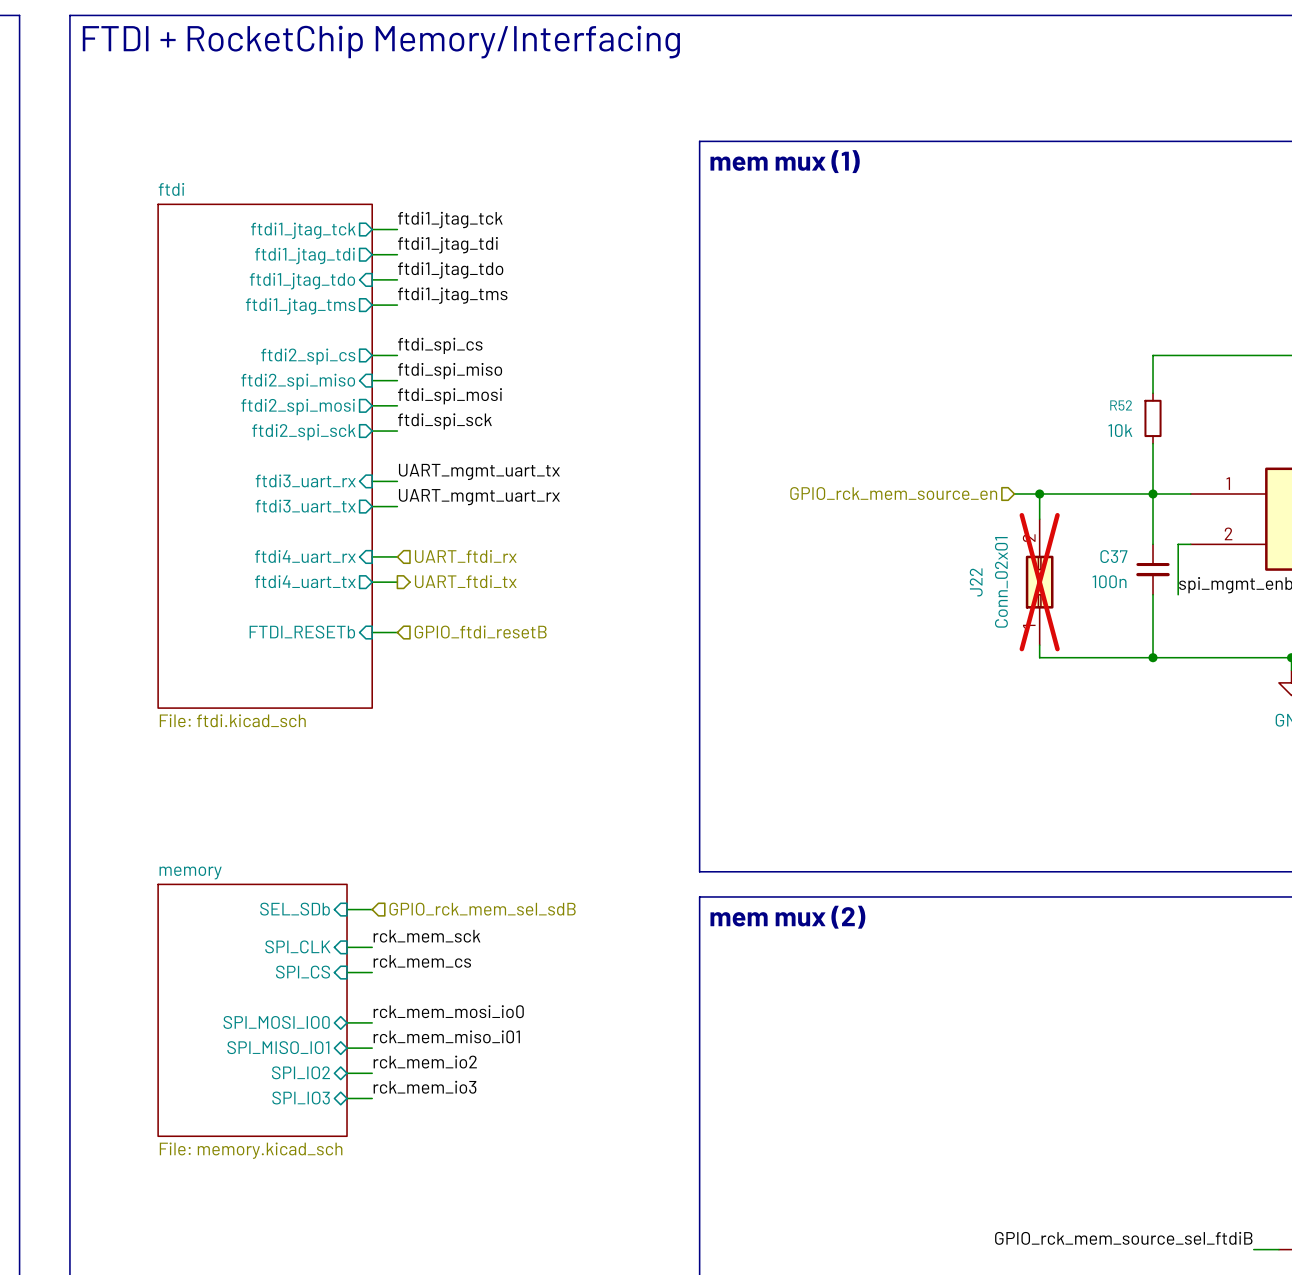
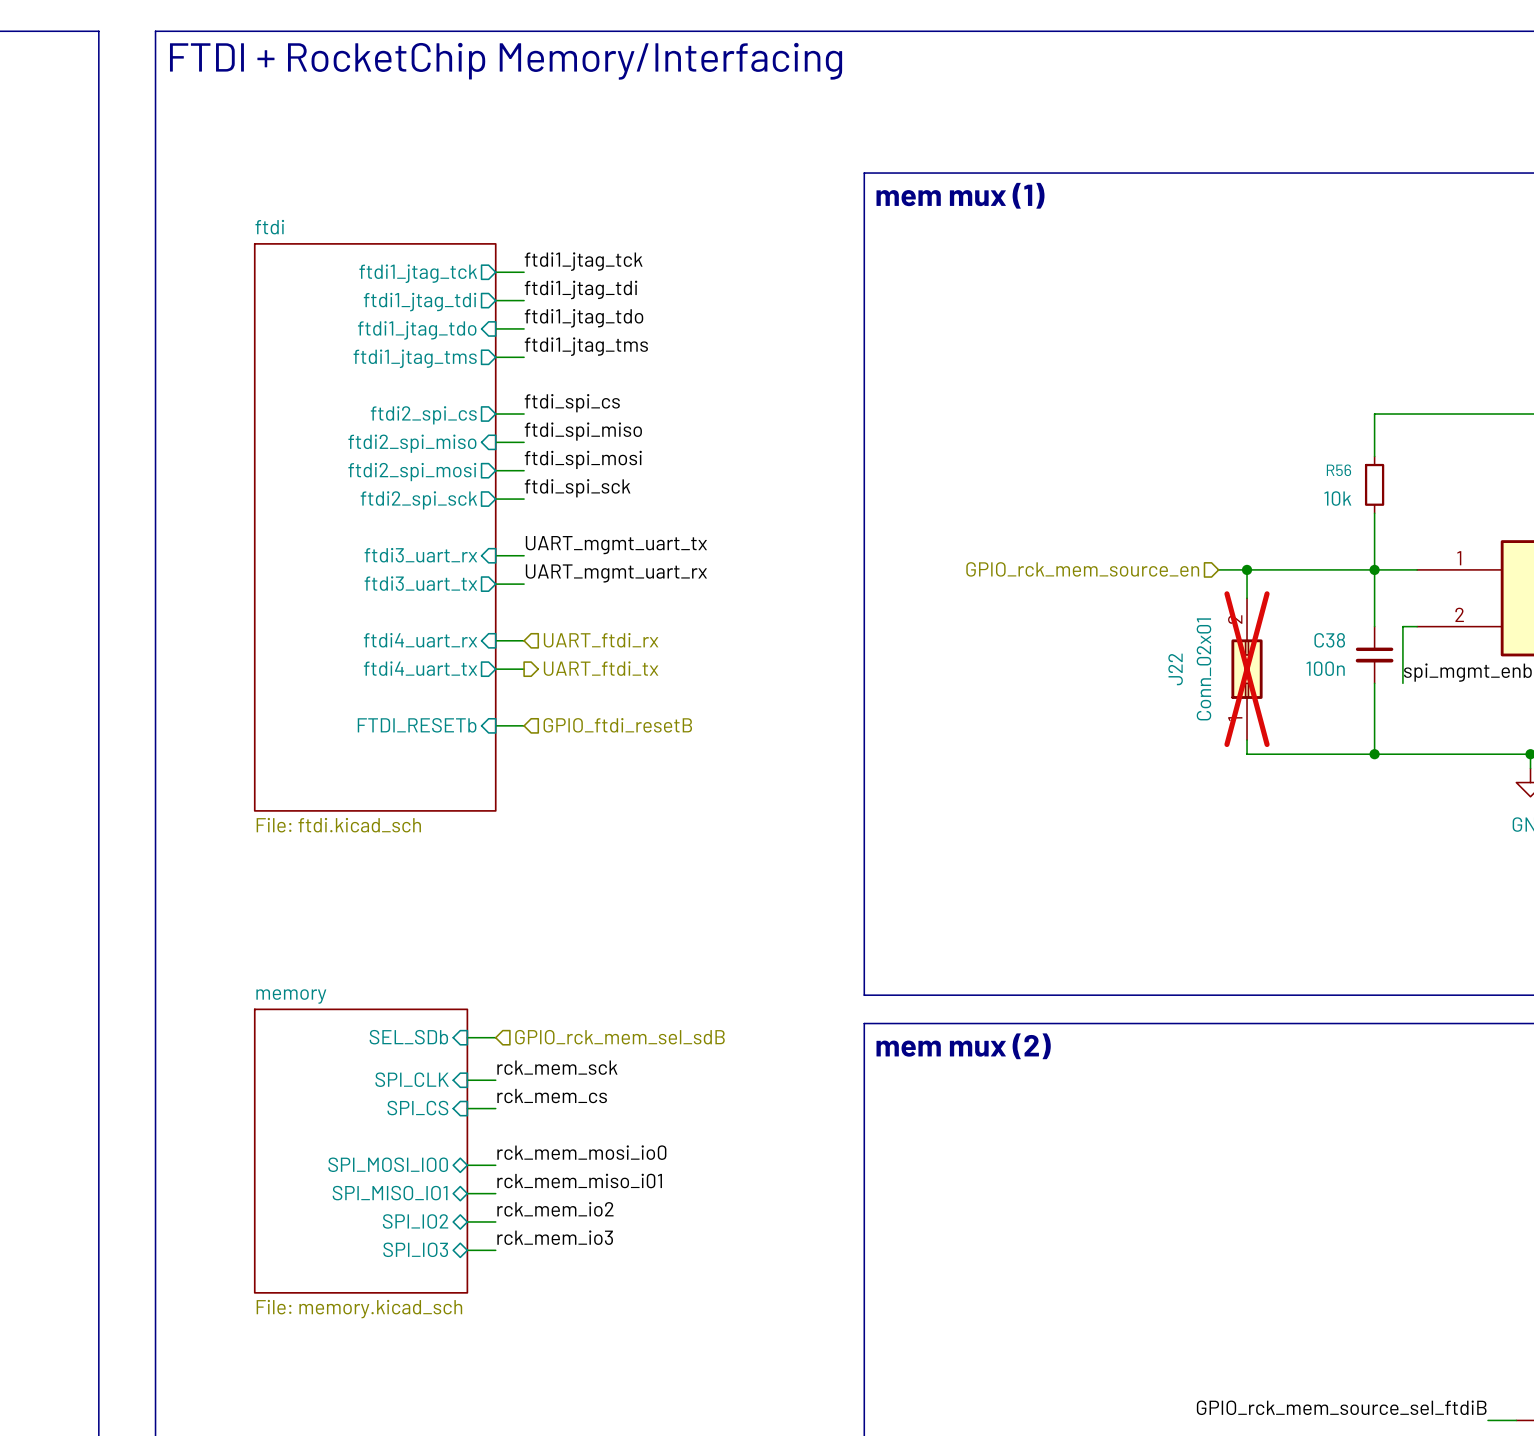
R52 name: R52 (1121, 405) -> R56 (1338, 470)
C37 name: C37 (1113, 556) -> C38 (1329, 640)

